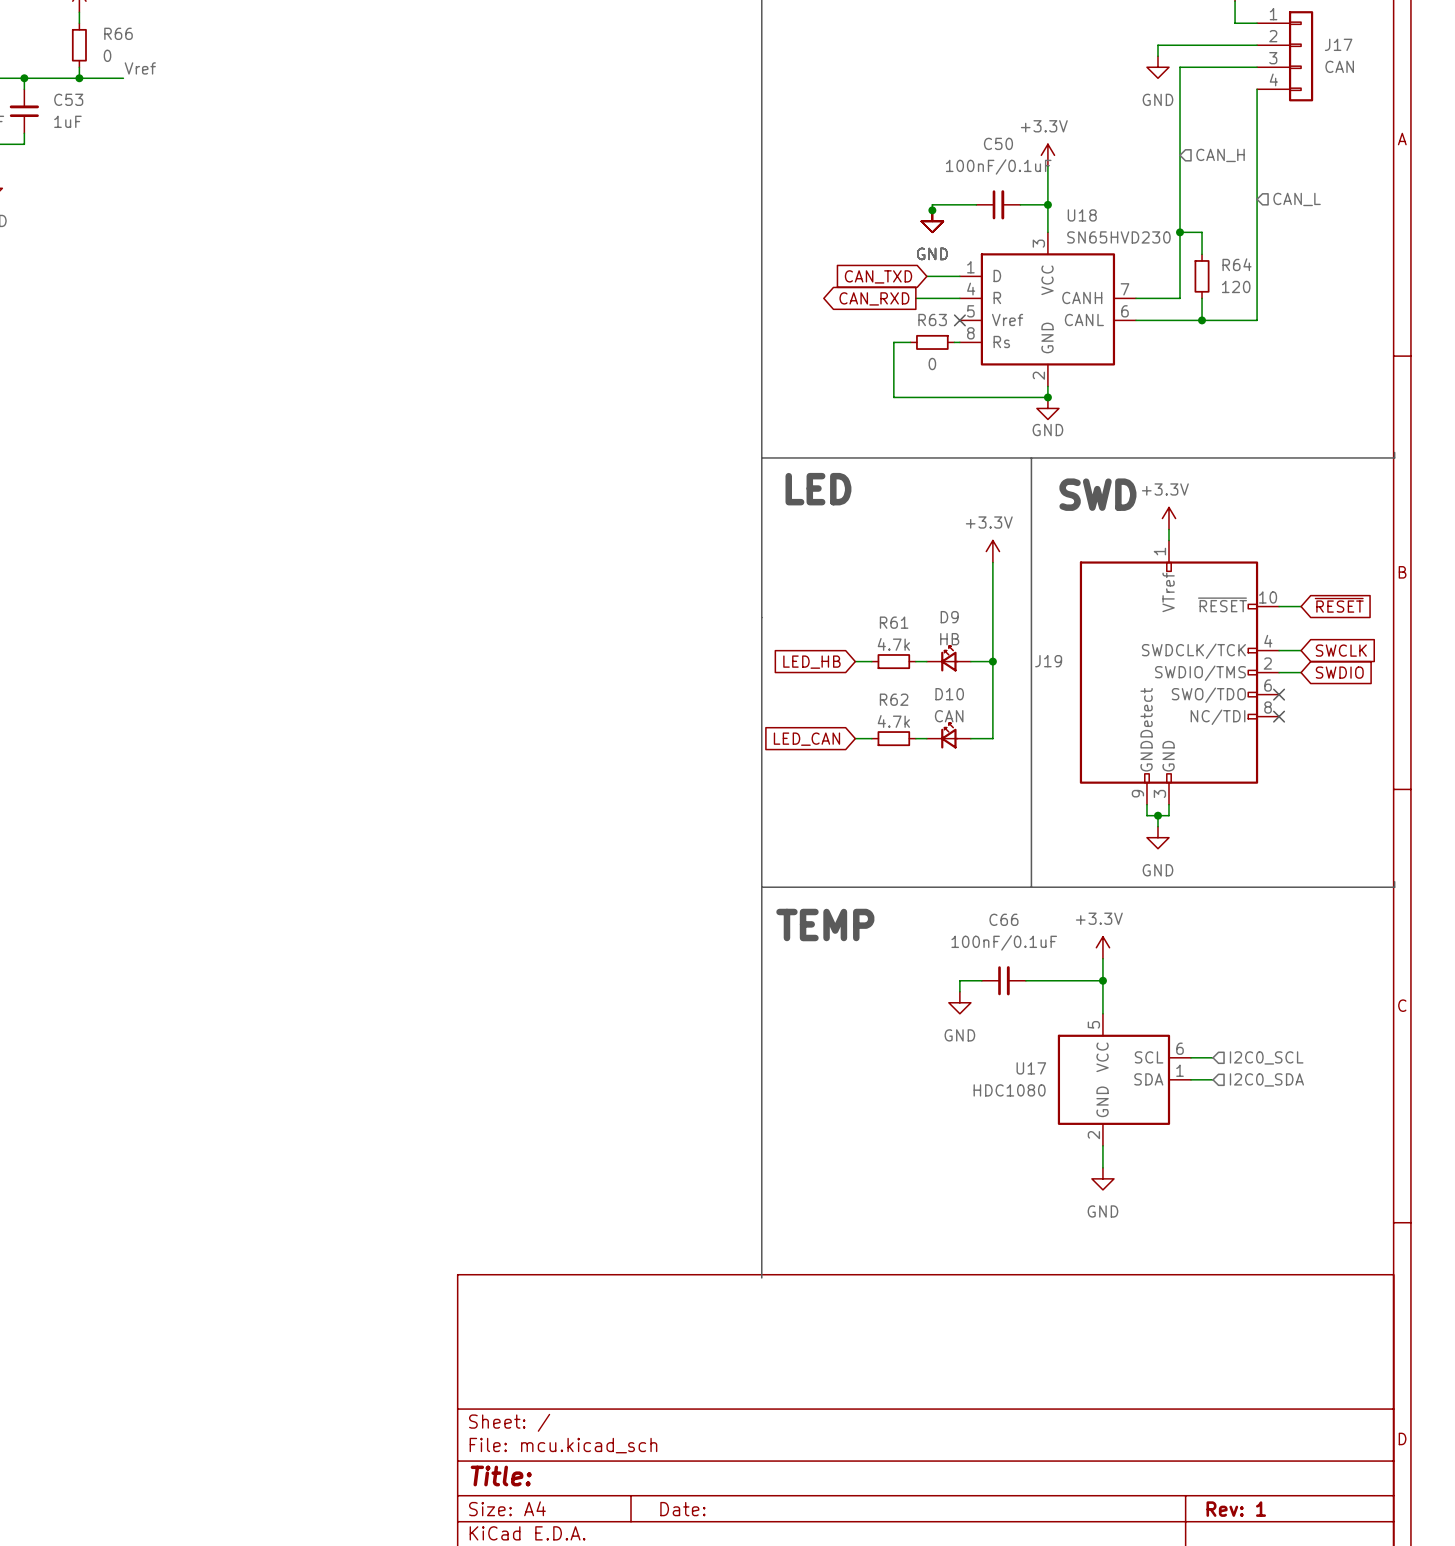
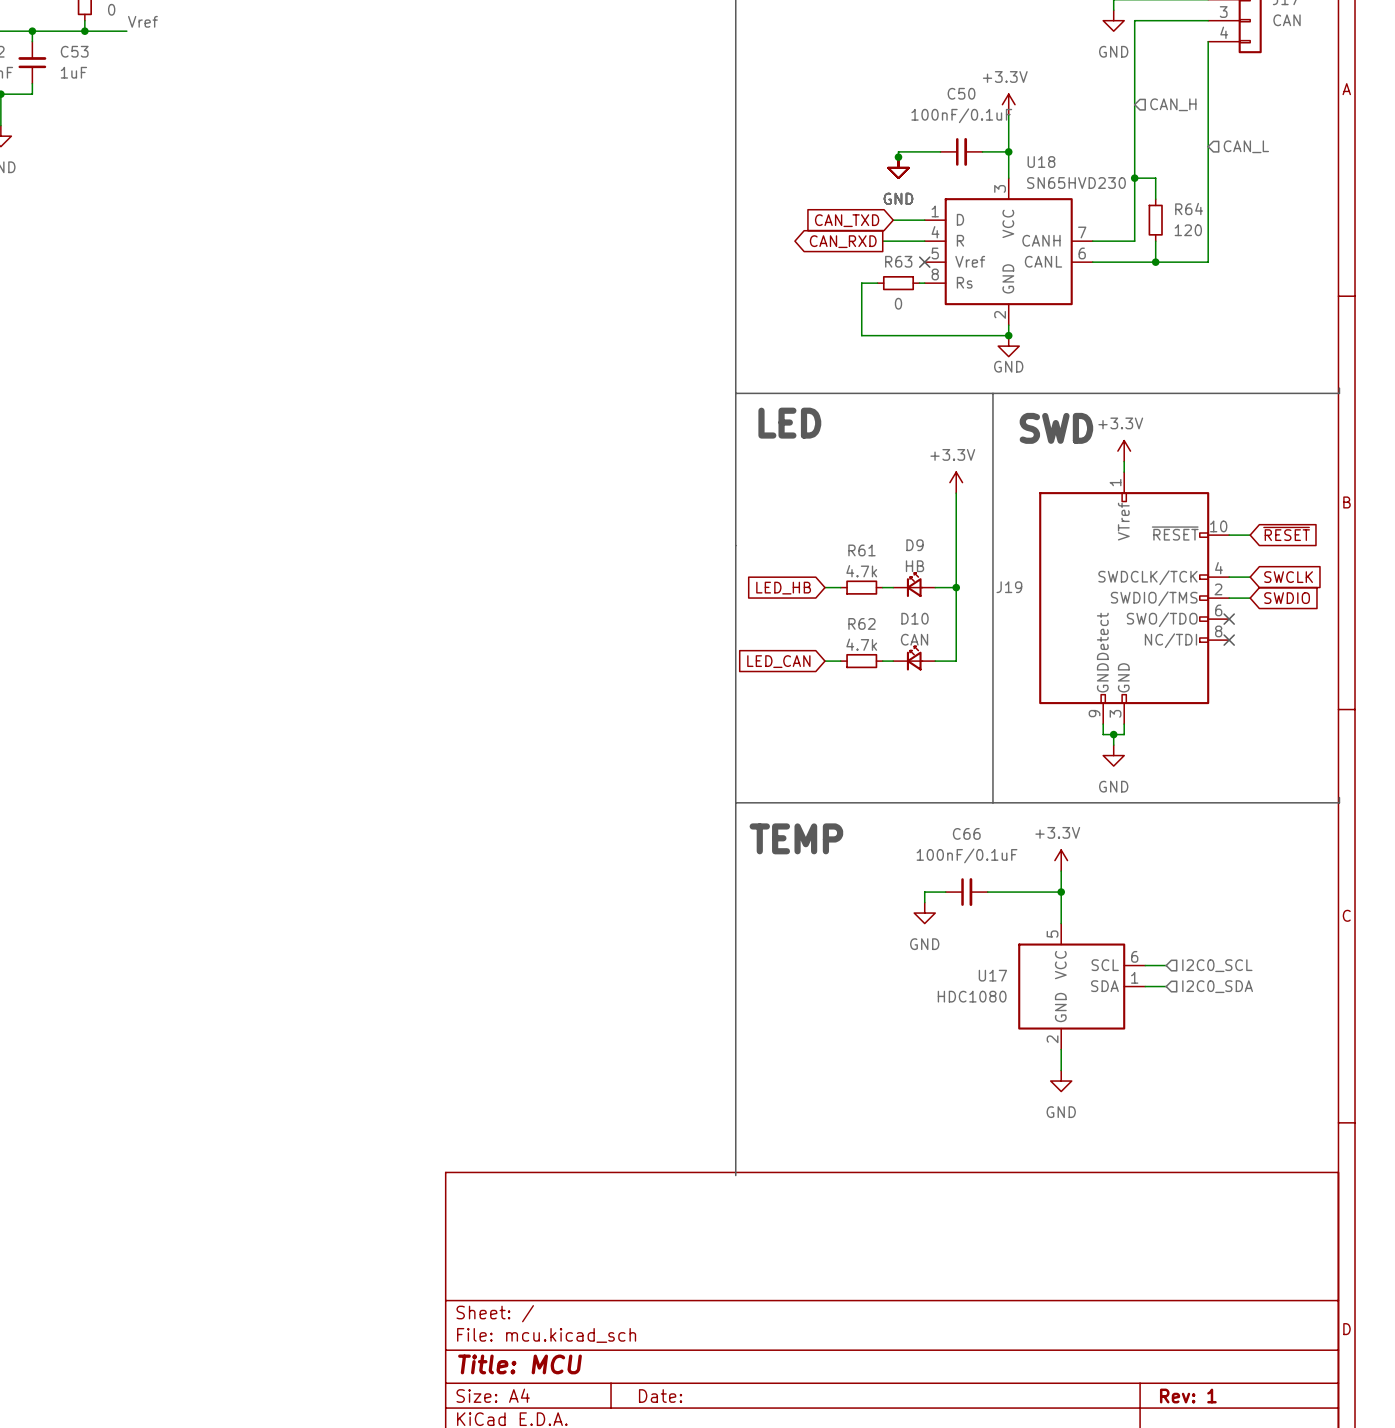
title block: Title: (501, 1476) -> Title: MCU (520, 1364)

